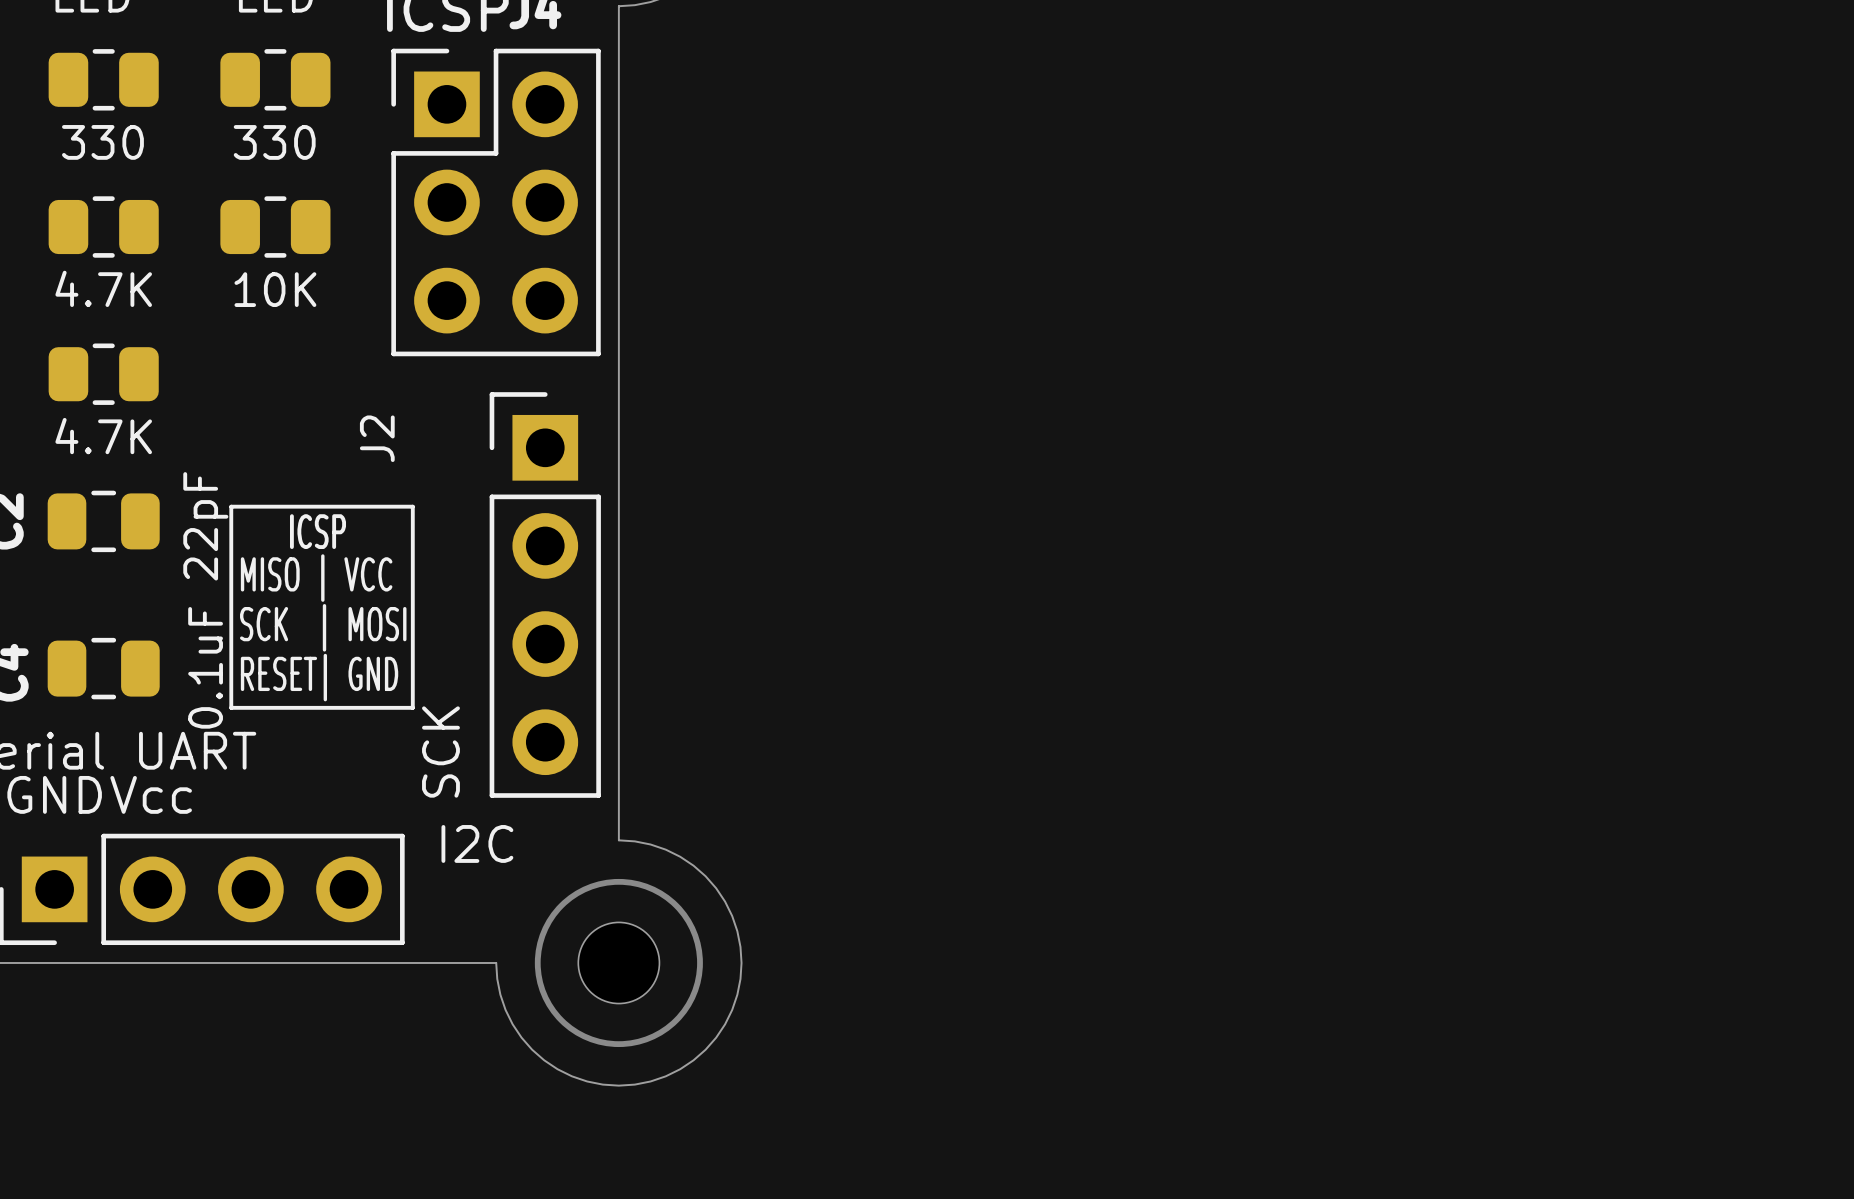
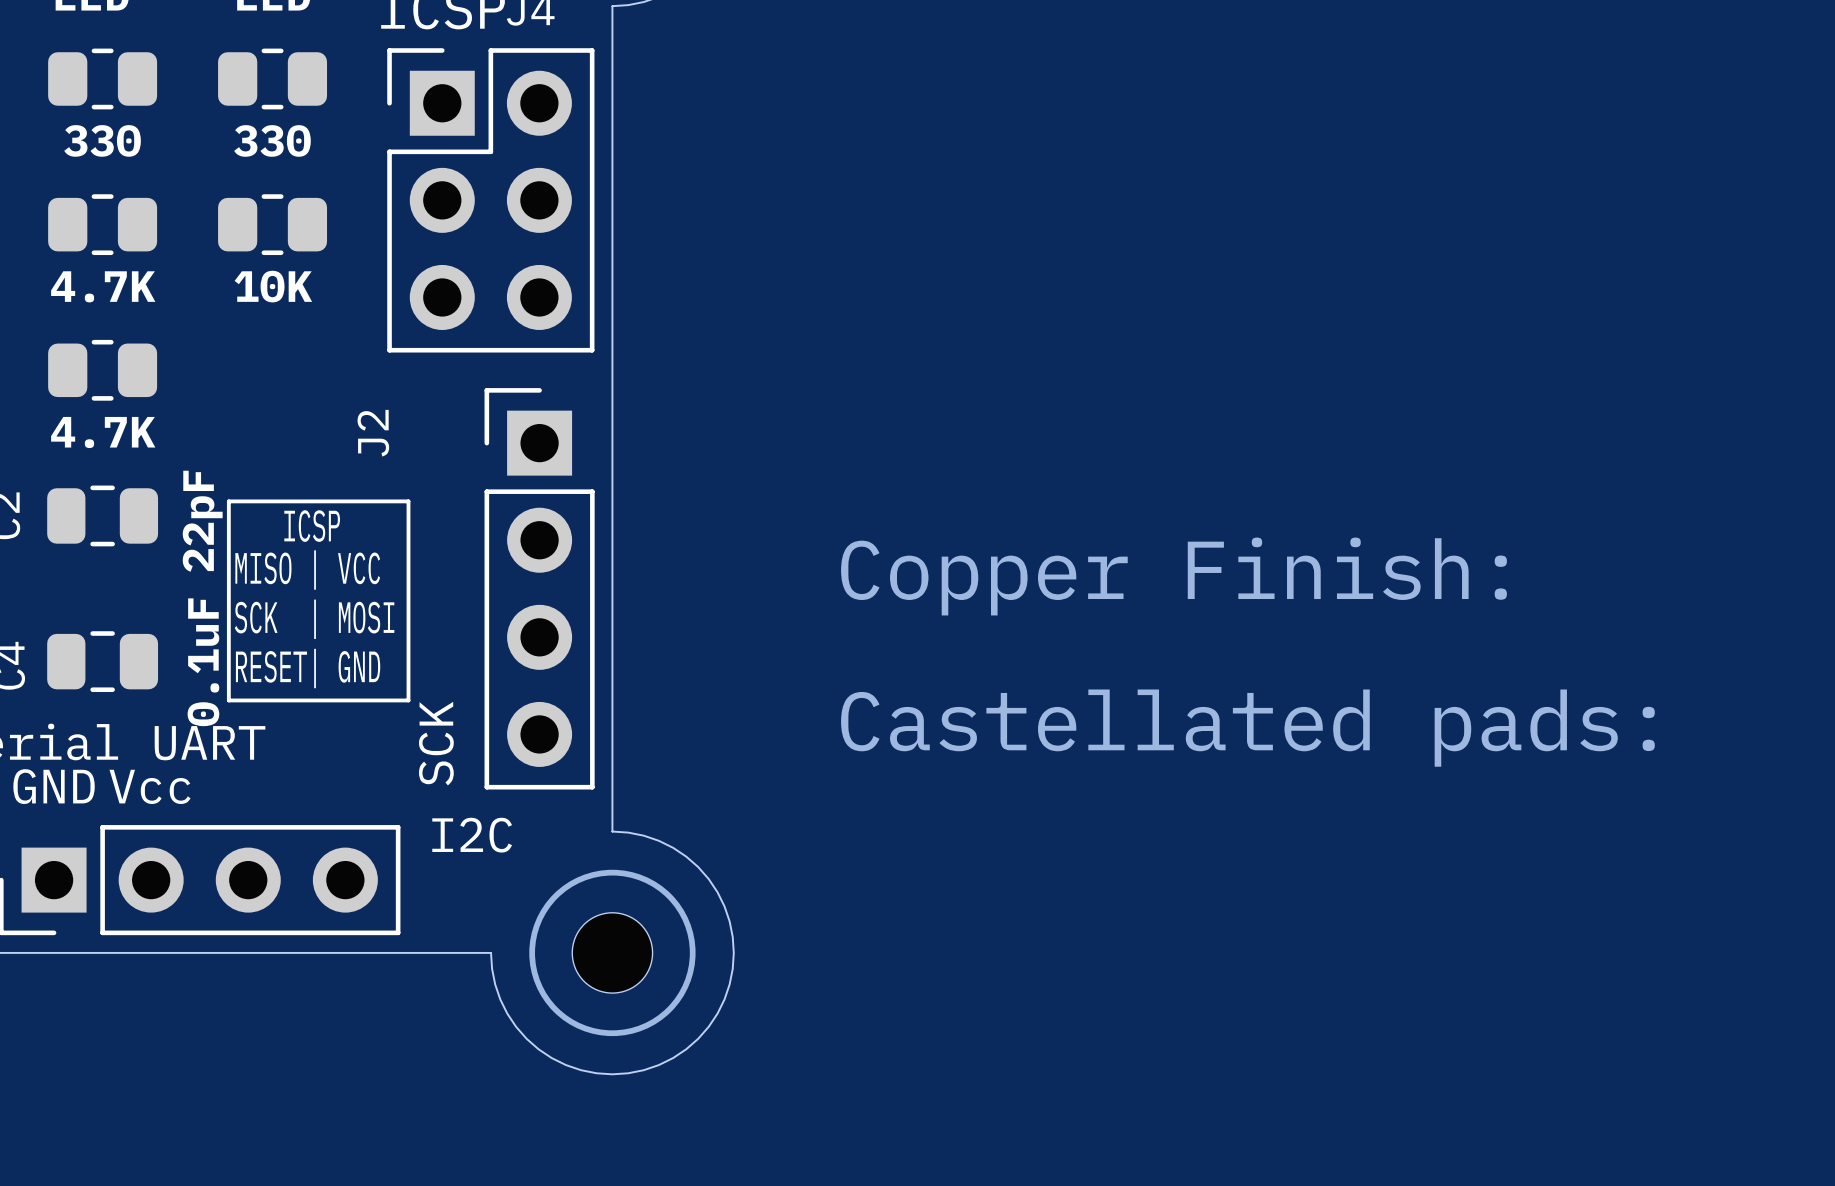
text: none -> Copper Finish: (1173, 576)
text: none -> Castellated pads: (1247, 728)

